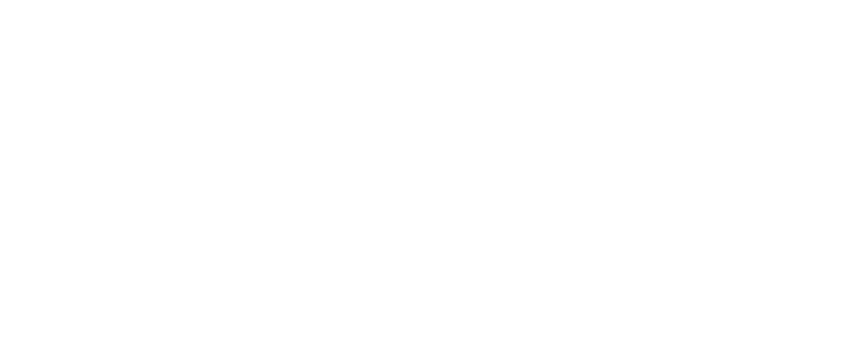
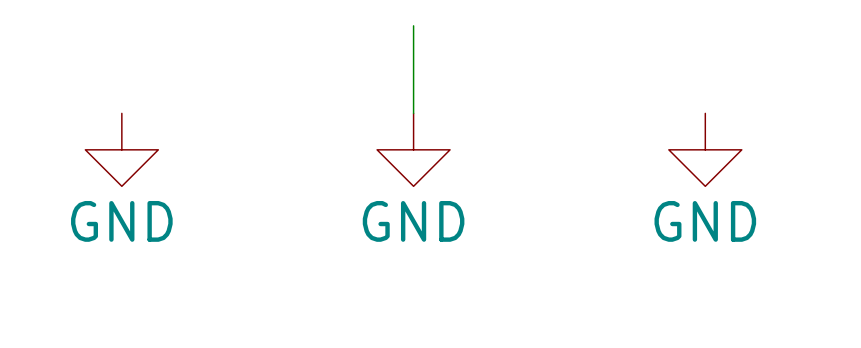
wire: none -> (413, 25) (413, 113)
power symbol: none -> GND (121, 149)
power symbol: none -> GND (413, 149)
power symbol: none -> GND (705, 149)

